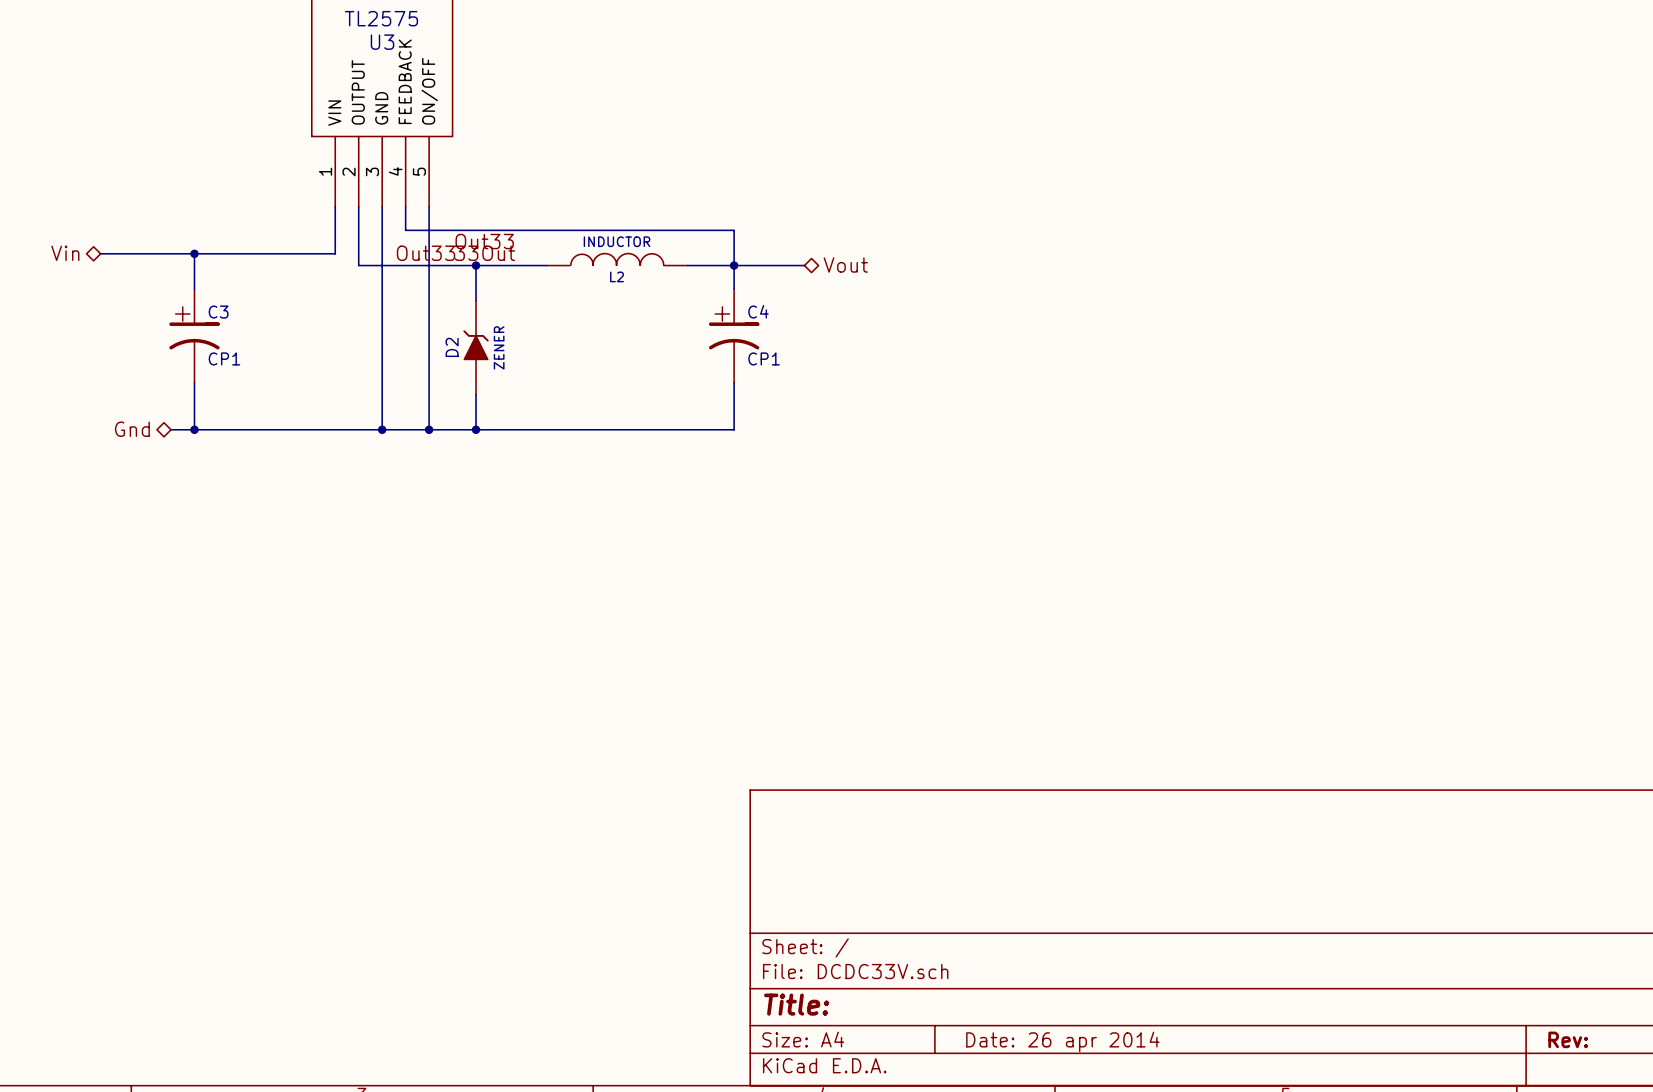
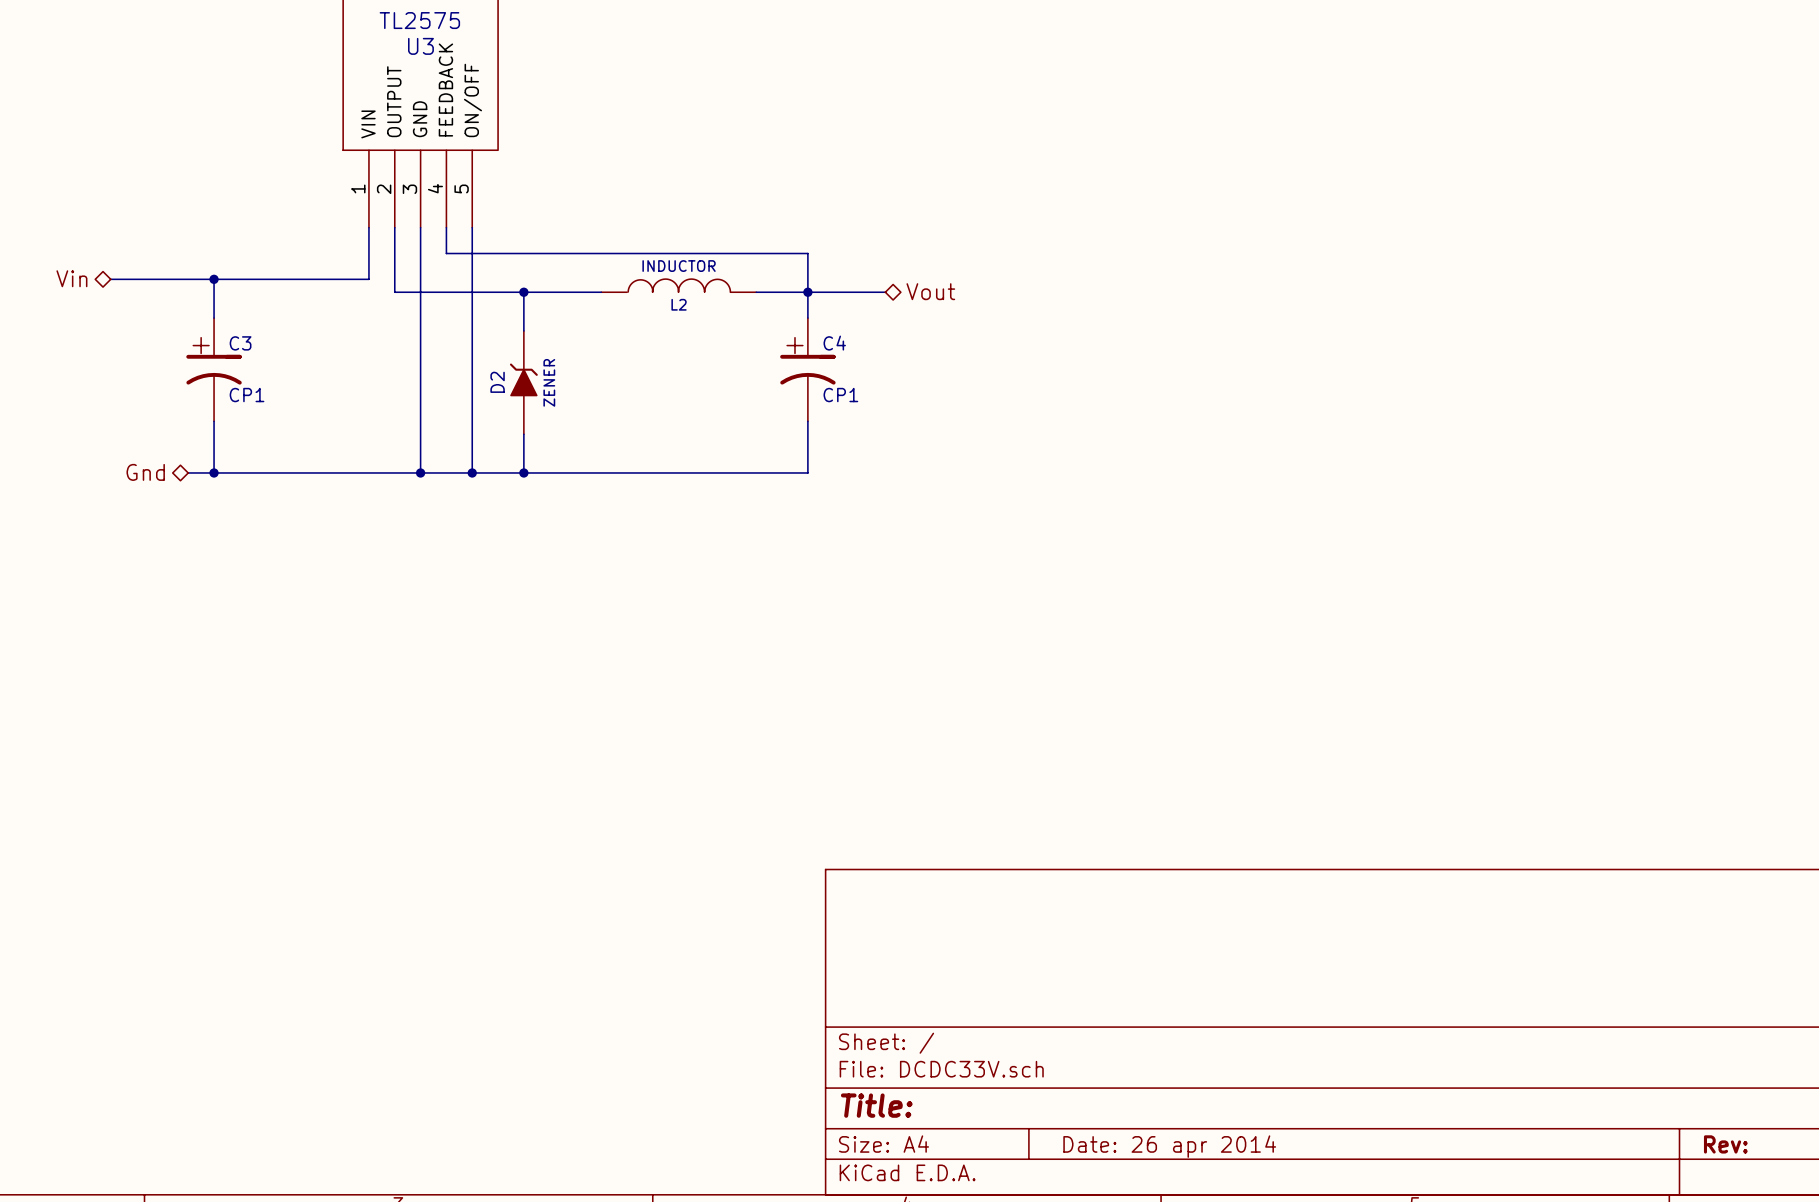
label: Out33 (484, 241) -> none
label: Out33 (426, 253) -> none
label: 33Out (484, 253) -> none

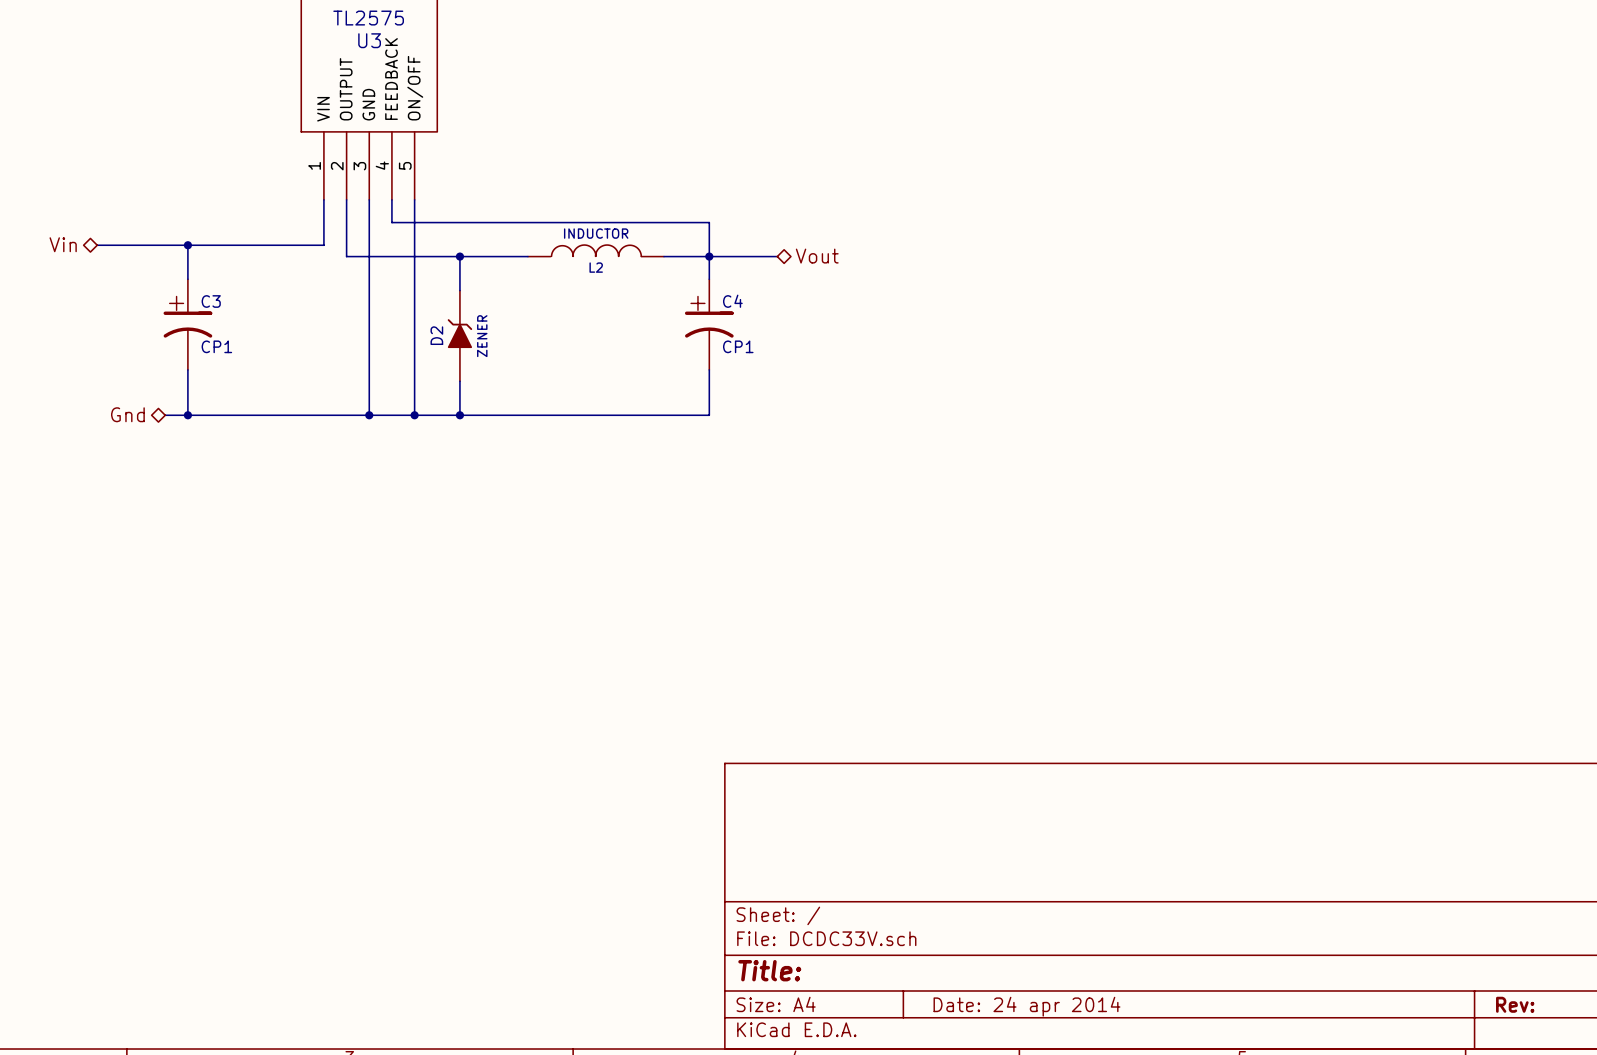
title block: Date: 26 apr 2014 (1169, 1146) -> Date: 24 apr 2014 (1026, 1006)

